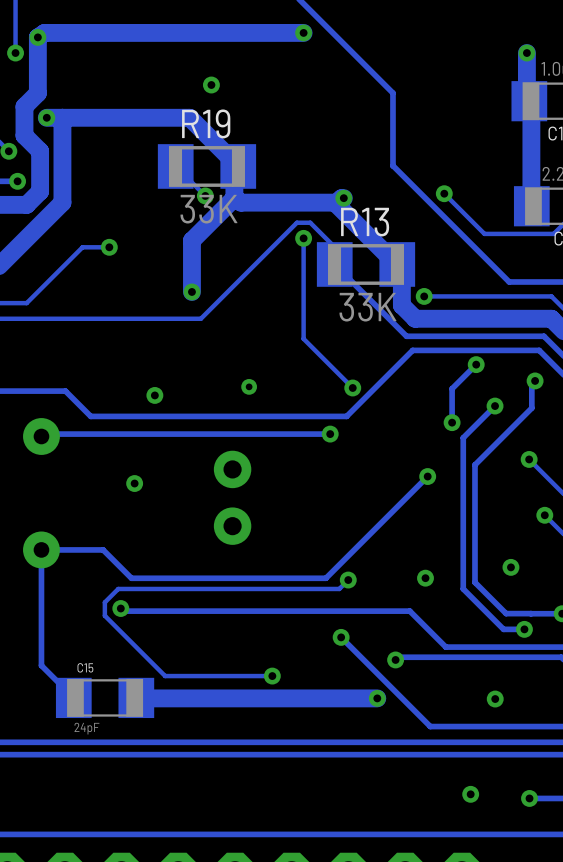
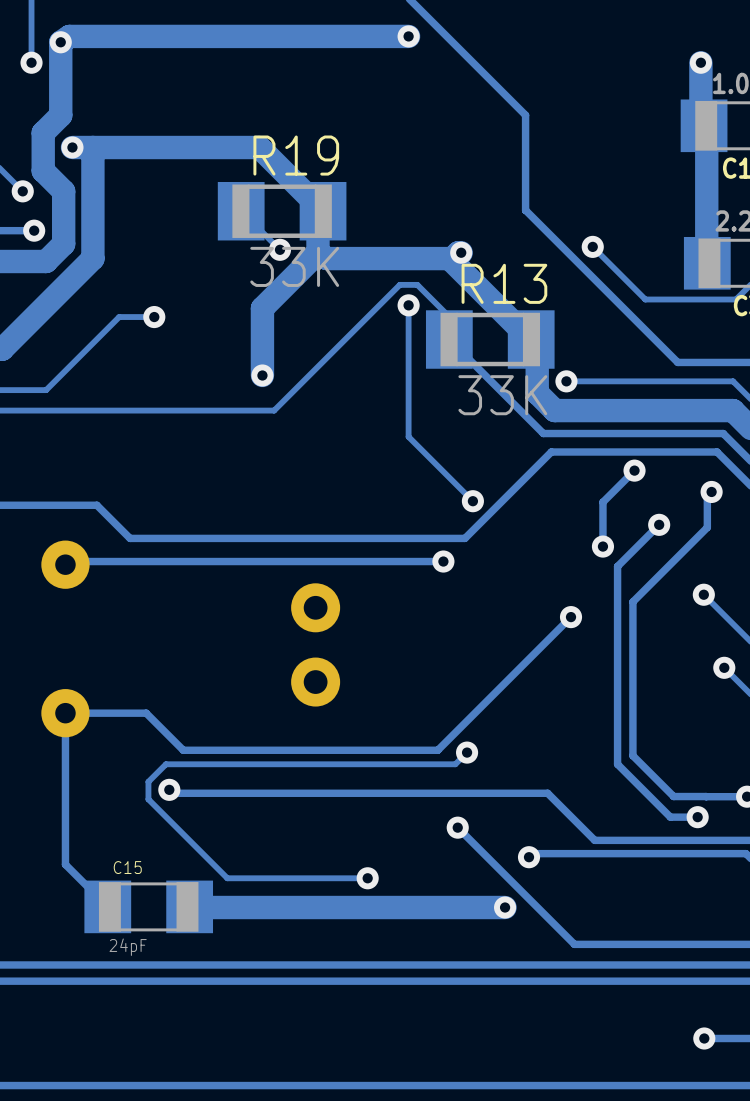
via: (211, 85) -> none
via: (249, 386) -> none
via: (154, 395) -> none
via: (134, 483) -> none
via: (510, 567) -> none
via: (425, 578) -> none
via: (495, 699) -> none
via: (470, 794) -> none

